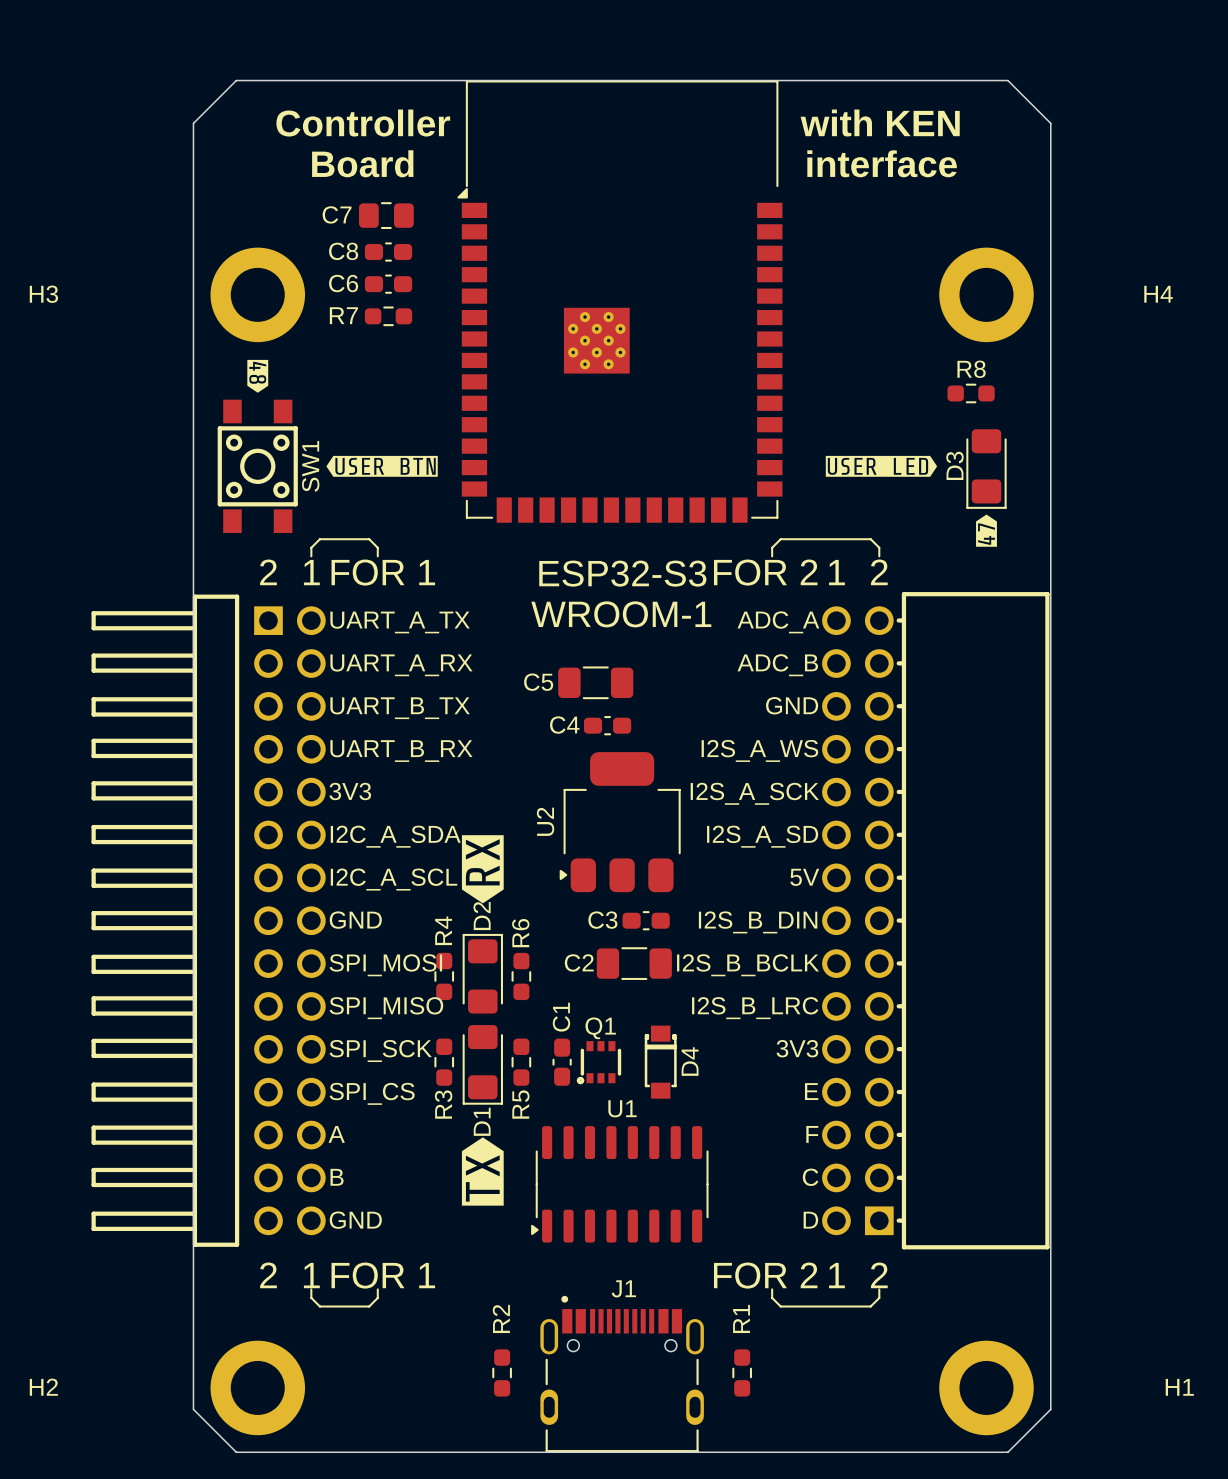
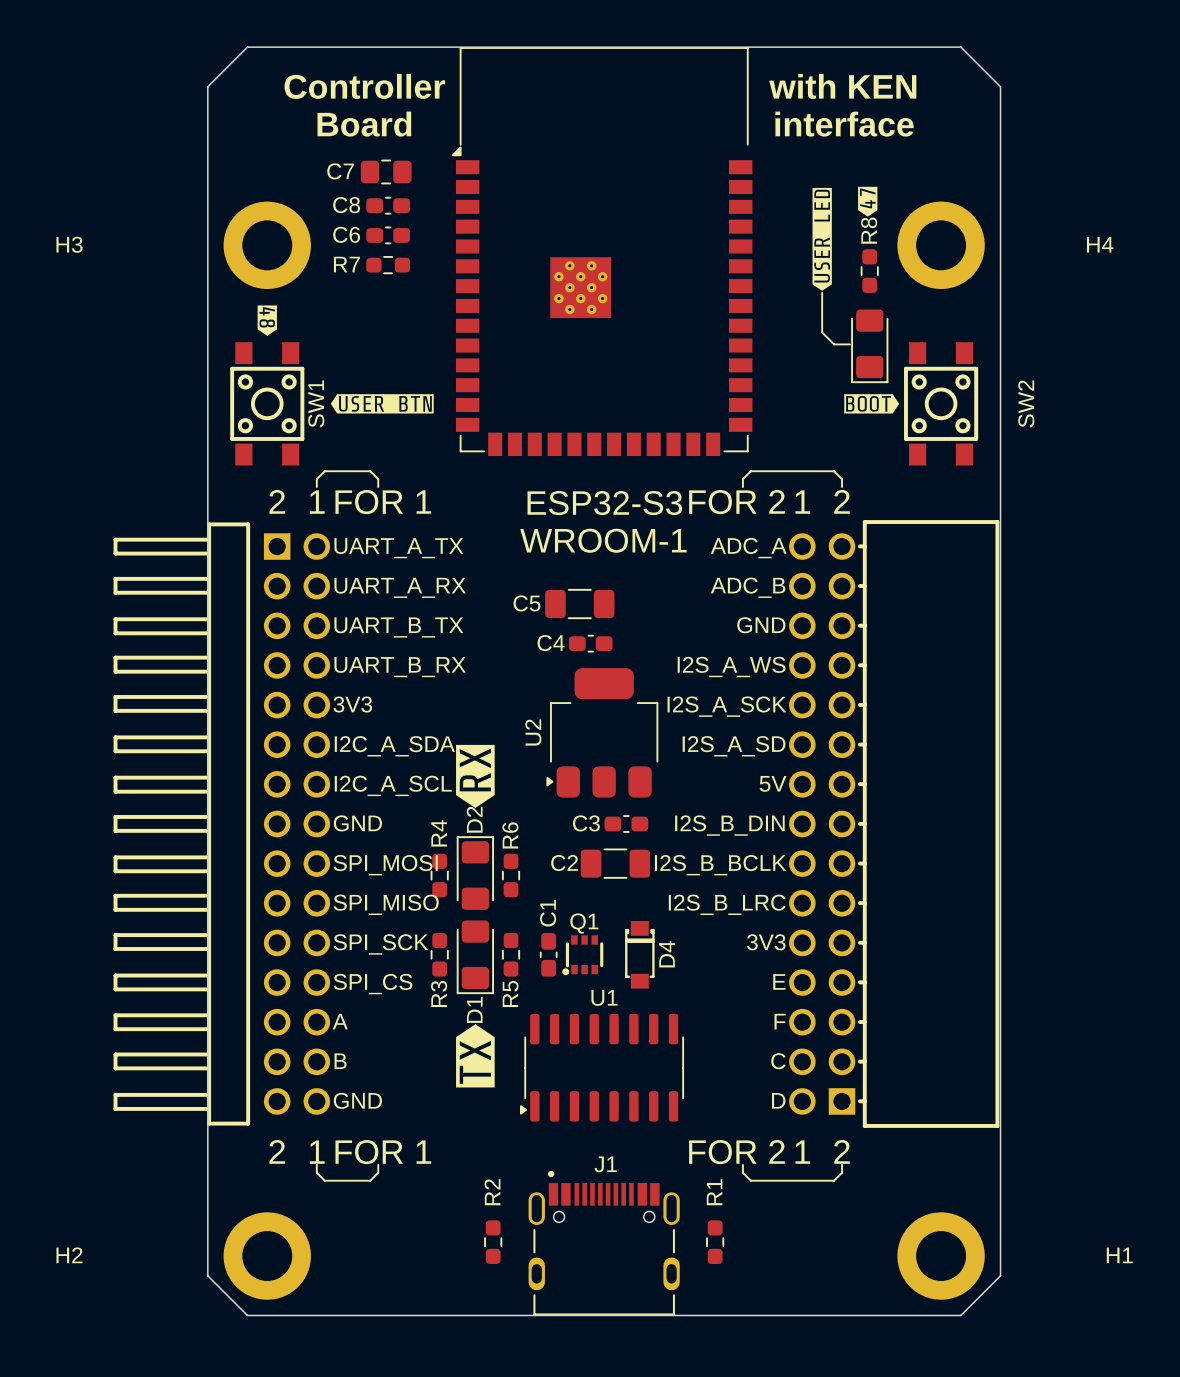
drawing: none -> [858, 186, 878, 217]
drawing: none -> [812, 187, 832, 291]
line: none -> (822, 292) (822, 332) (834, 344) (849, 344)
R8 rotation: 0° (971, 393) -> 90° clockwise (869, 271)
R8 position: (971, 393) -> (869, 271)
part: none -> (869, 346)
drawing: [825, 455, 938, 477] -> none
drawing: none -> [844, 394, 900, 414]
SW2: none -> (941, 403)
D3: (986, 469) -> none
drawing: [976, 514, 997, 547] -> none

